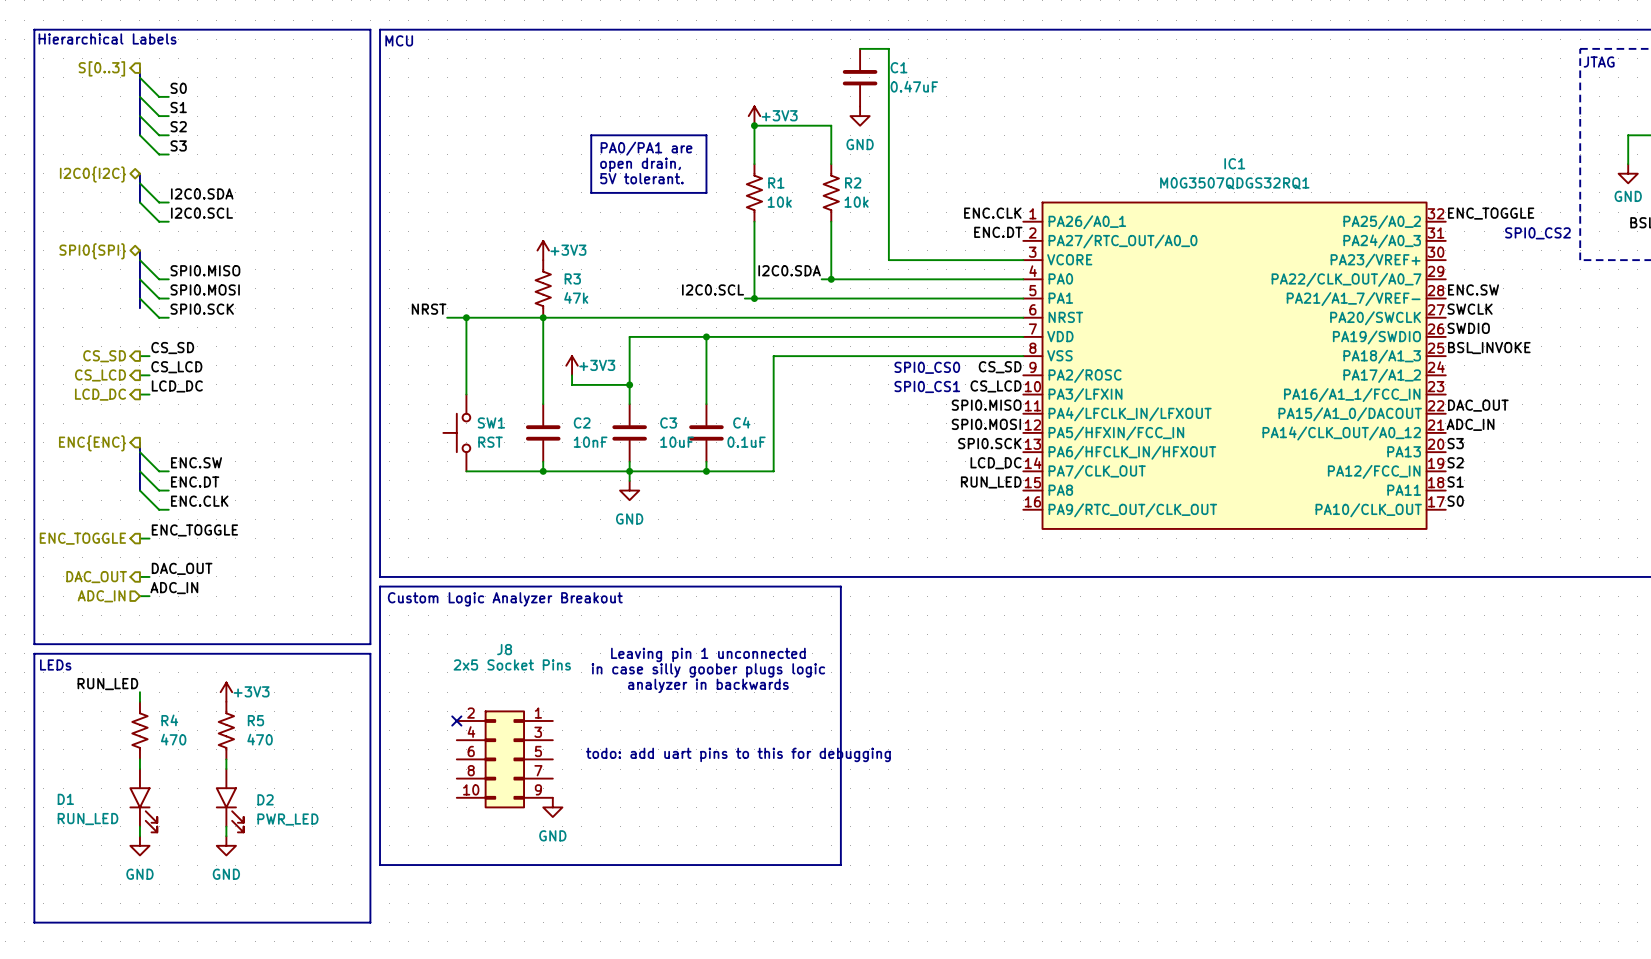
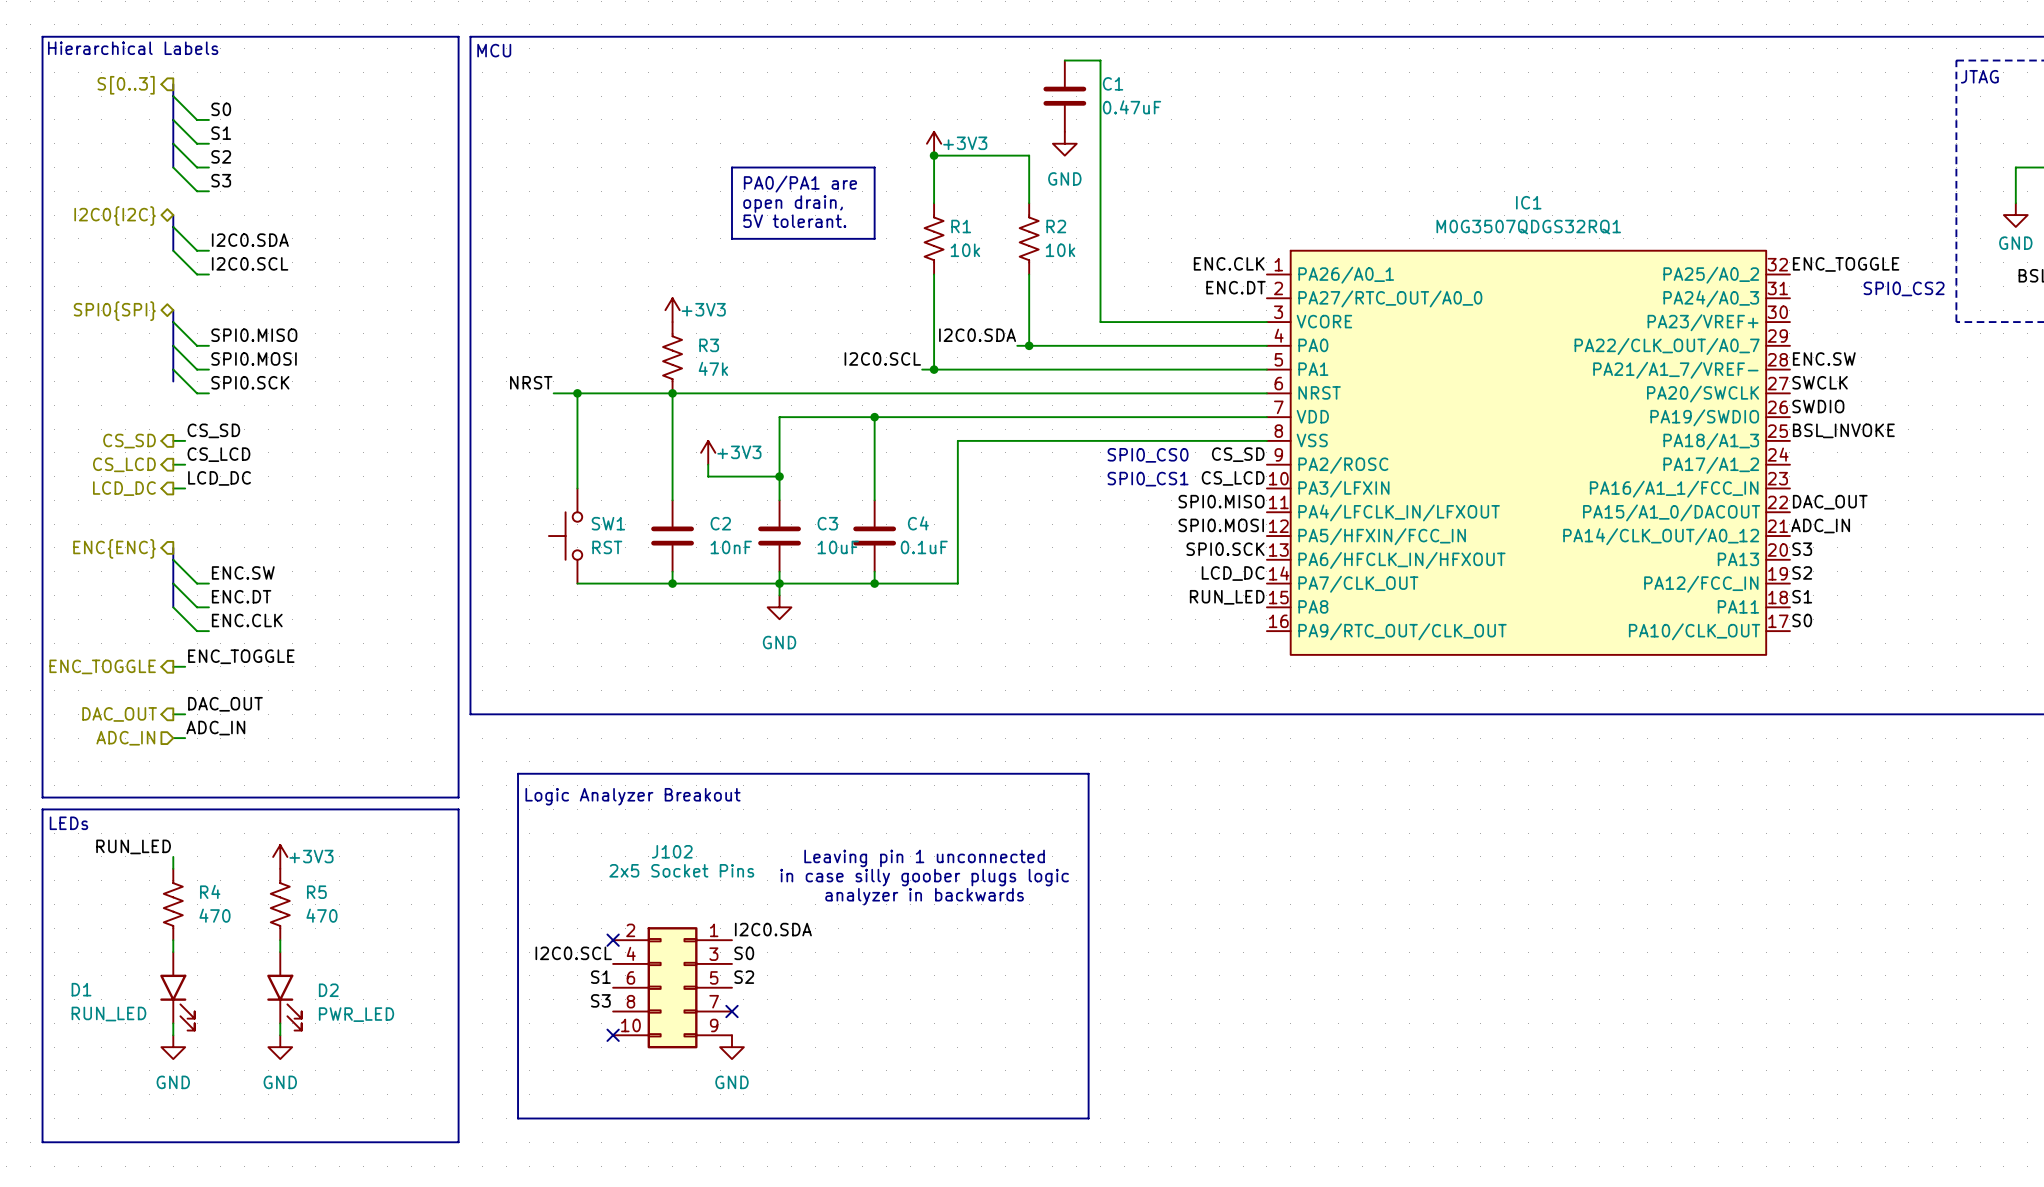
line: (380, 586) (840, 586) (840, 865) (380, 865) (380, 586) -> (518, 773) (1088, 773) (1088, 1118) (518, 1118) (518, 773)
text: Custom Logic Analyzer Breakout (505, 599) -> none
text: none -> Logic Analyzer Breakout (632, 796)
text position: Leaving pin 1 unconnected (708, 654) -> Leaving pin 1 unconnected (924, 858)
text position: in case silly goober plugs logic (708, 670) -> in case silly goober plugs logic (924, 877)
text position: analyzer in backwards (708, 685) -> analyzer in backwards (924, 896)
no-connect mark: (456, 720) -> none
label: none -> I2C0.SDA (773, 929)
text: todo: add uart pins to this for debugging (738, 754) -> none
no-connect mark: none -> (613, 940)
J8: 2x5 Socket Pins (504, 759) -> none
label: none -> I2C0.SCL (573, 953)
label: none -> S0 (744, 953)
label: none -> S1 (600, 977)
label: none -> S2 (744, 977)
J102: none -> 2x5 Socket Pins (672, 987)
power symbol position: GND (552, 807) -> GND (731, 1047)
label: none -> S3 (600, 1000)
no-connect mark: none -> (731, 1011)
no-connect mark: none -> (613, 1035)

